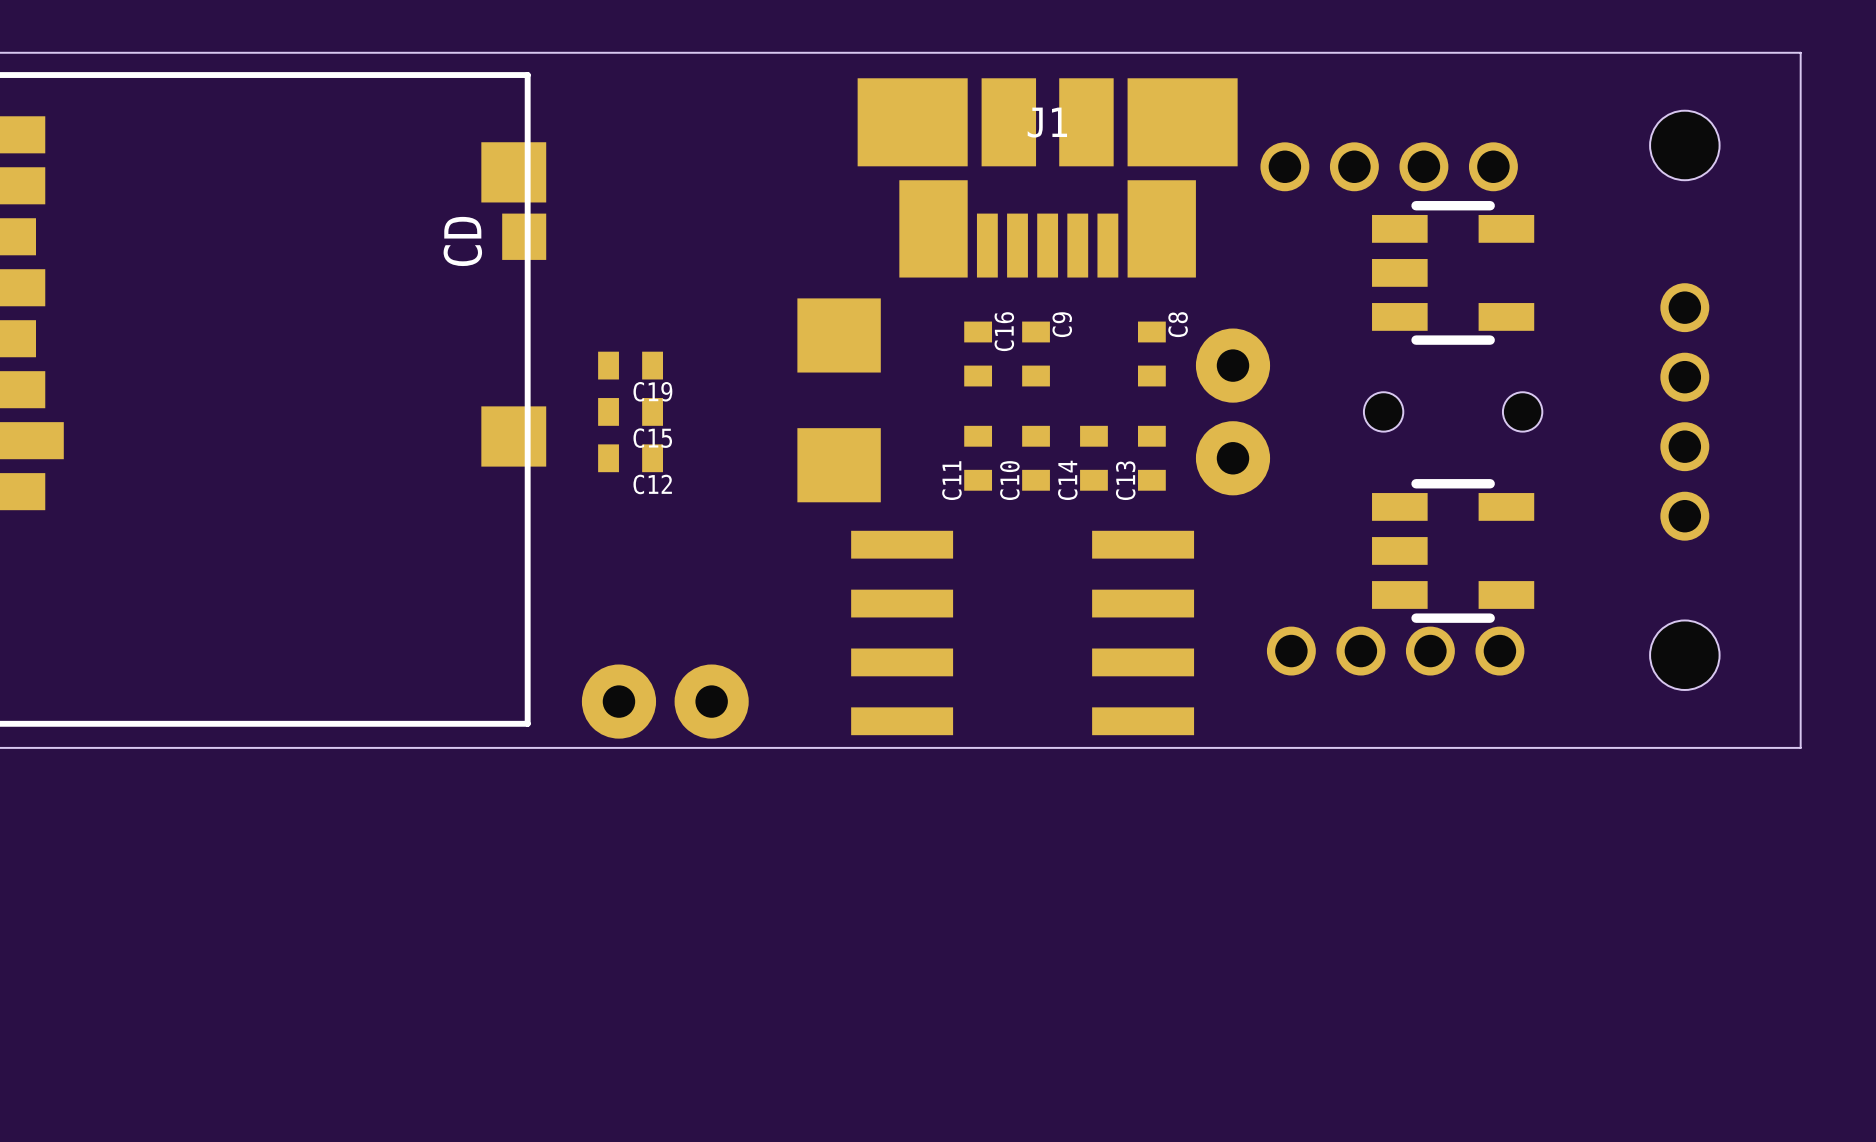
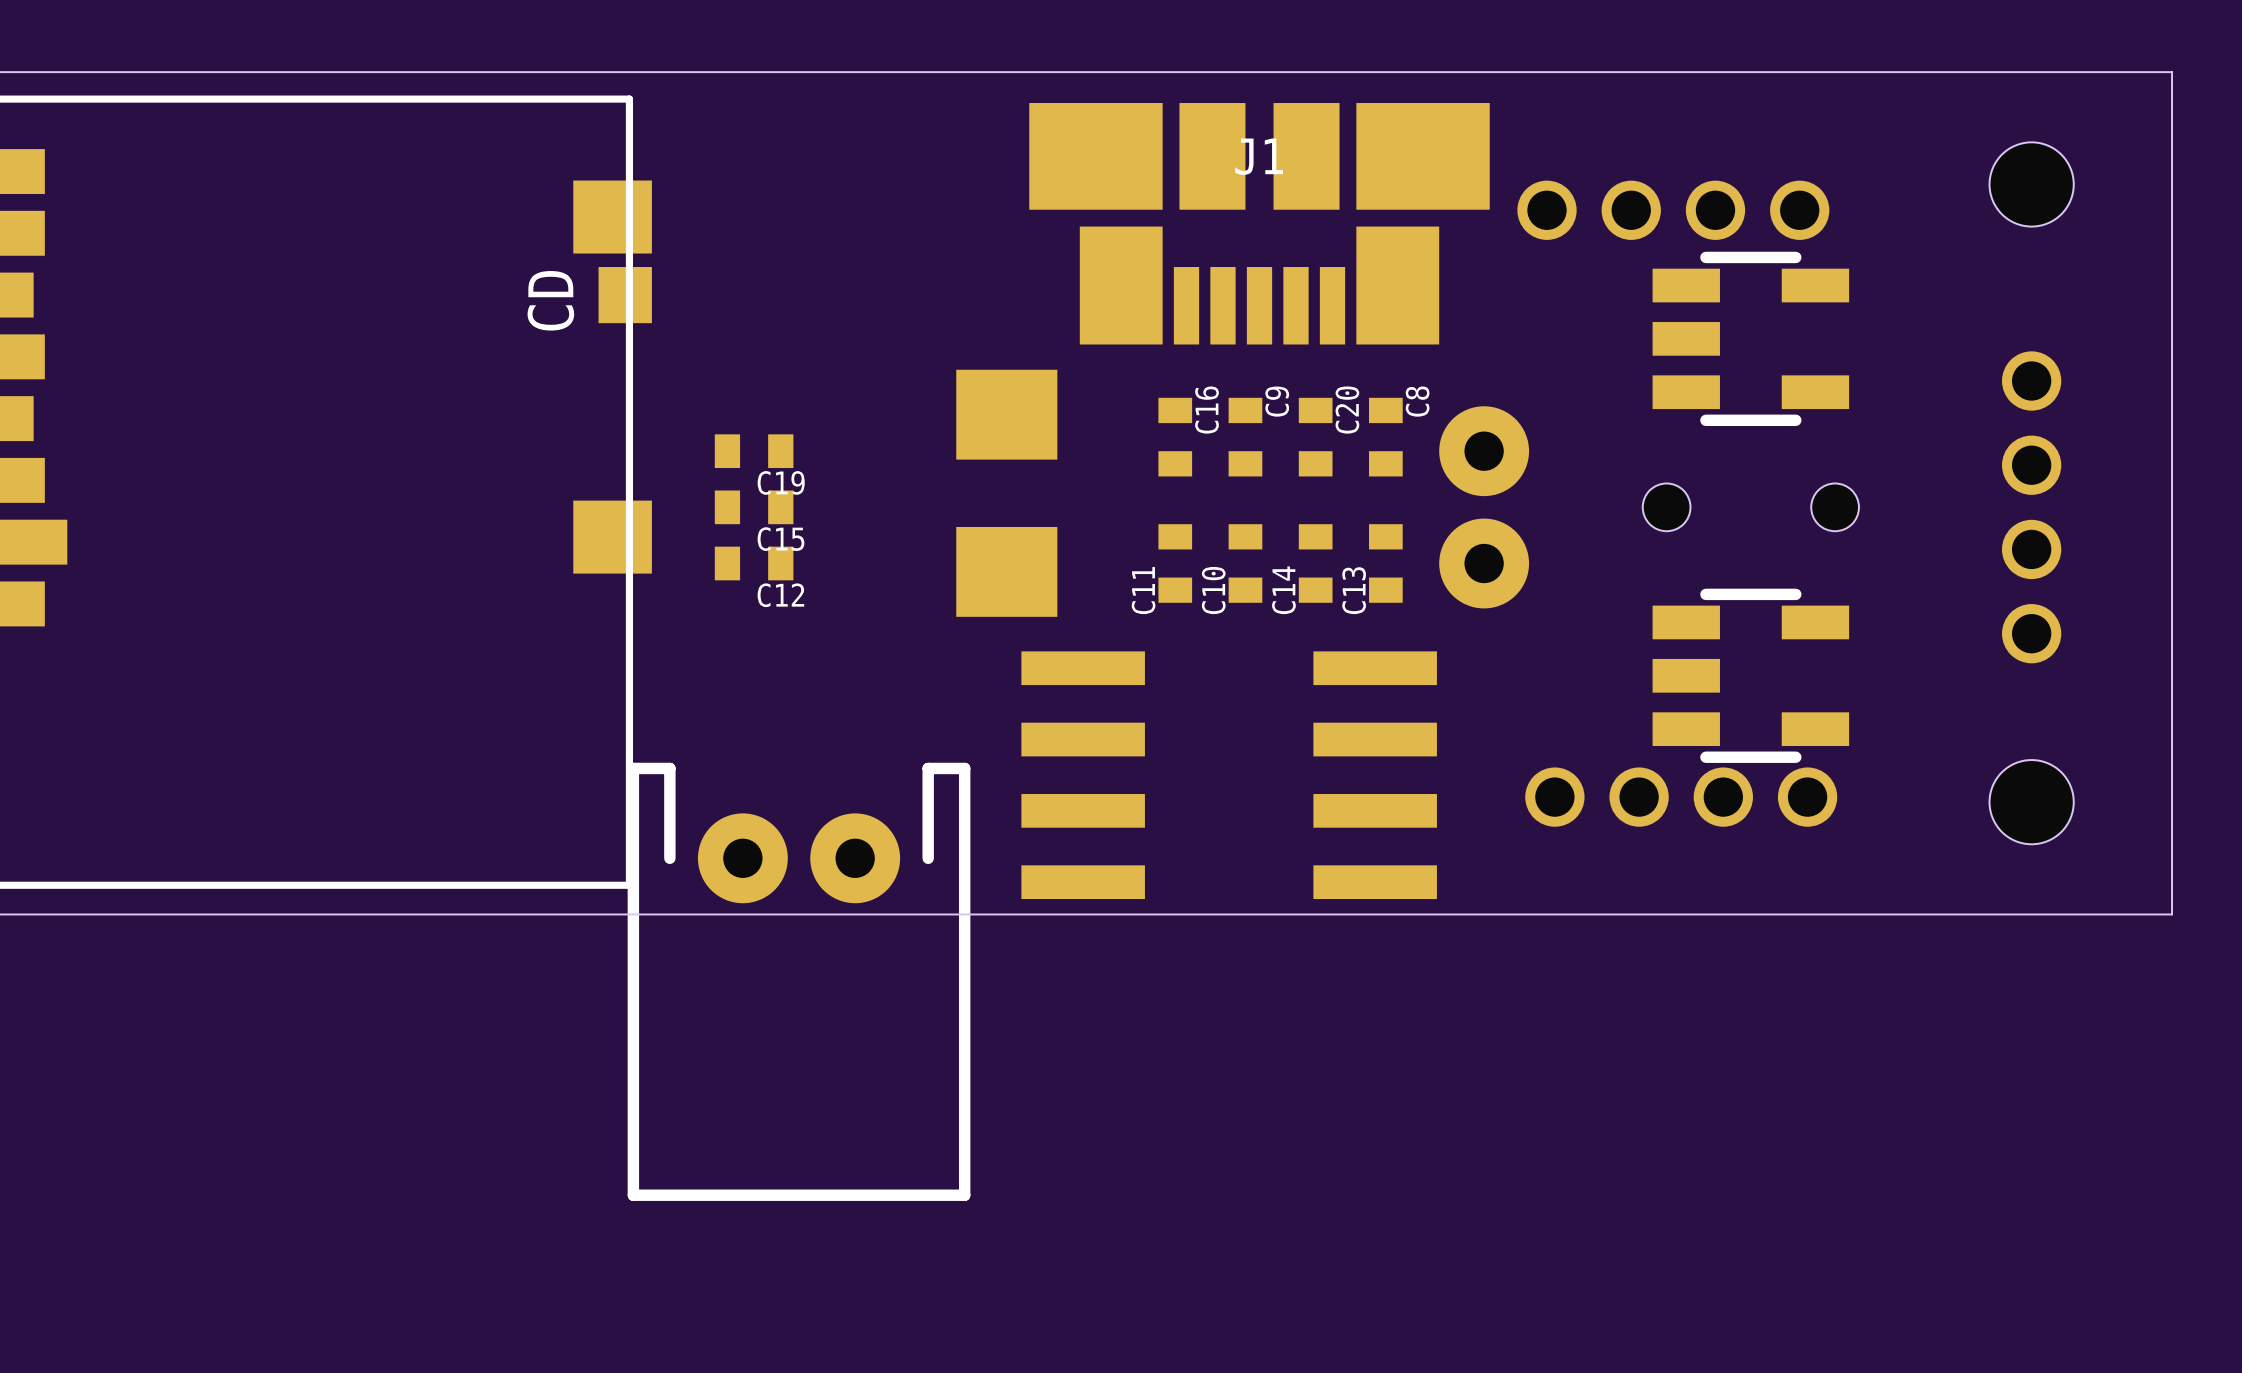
C20: none -> (1315, 437)
part: (665, 701) -> none
part: none -> (799, 981)

